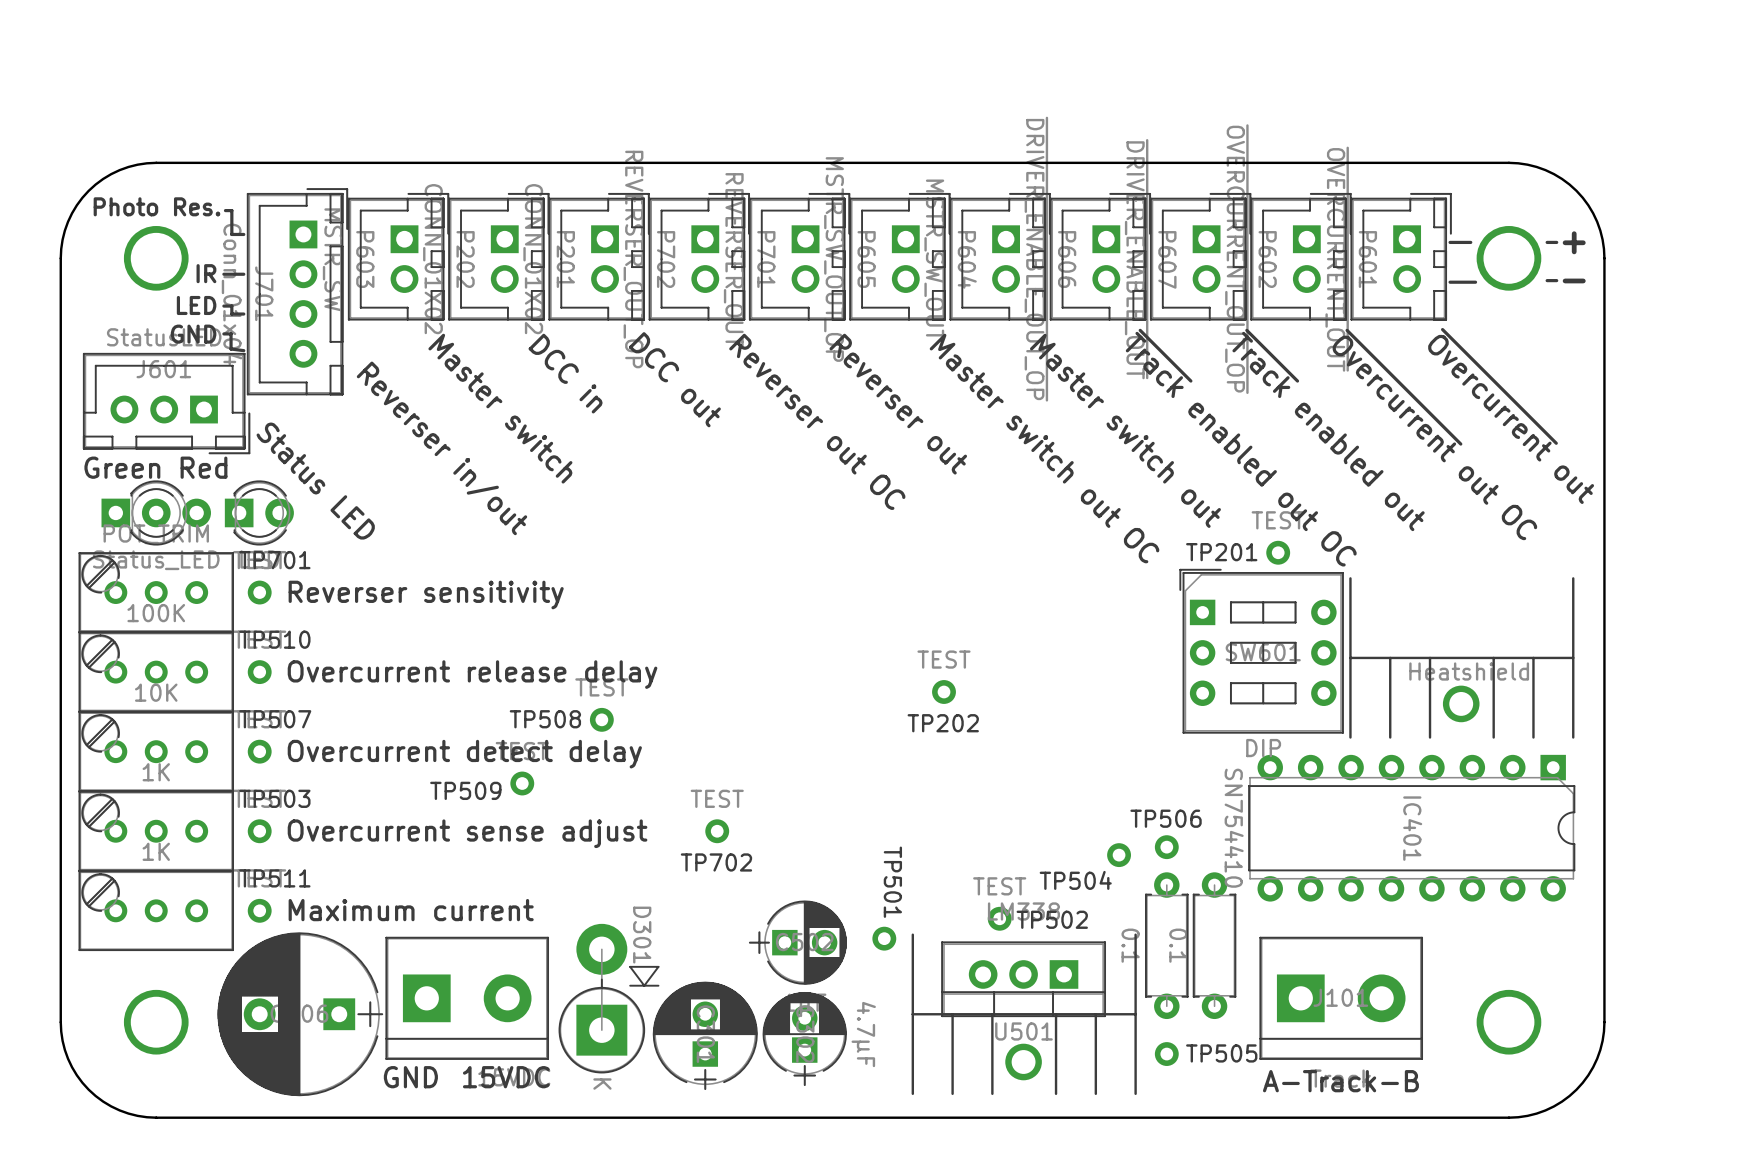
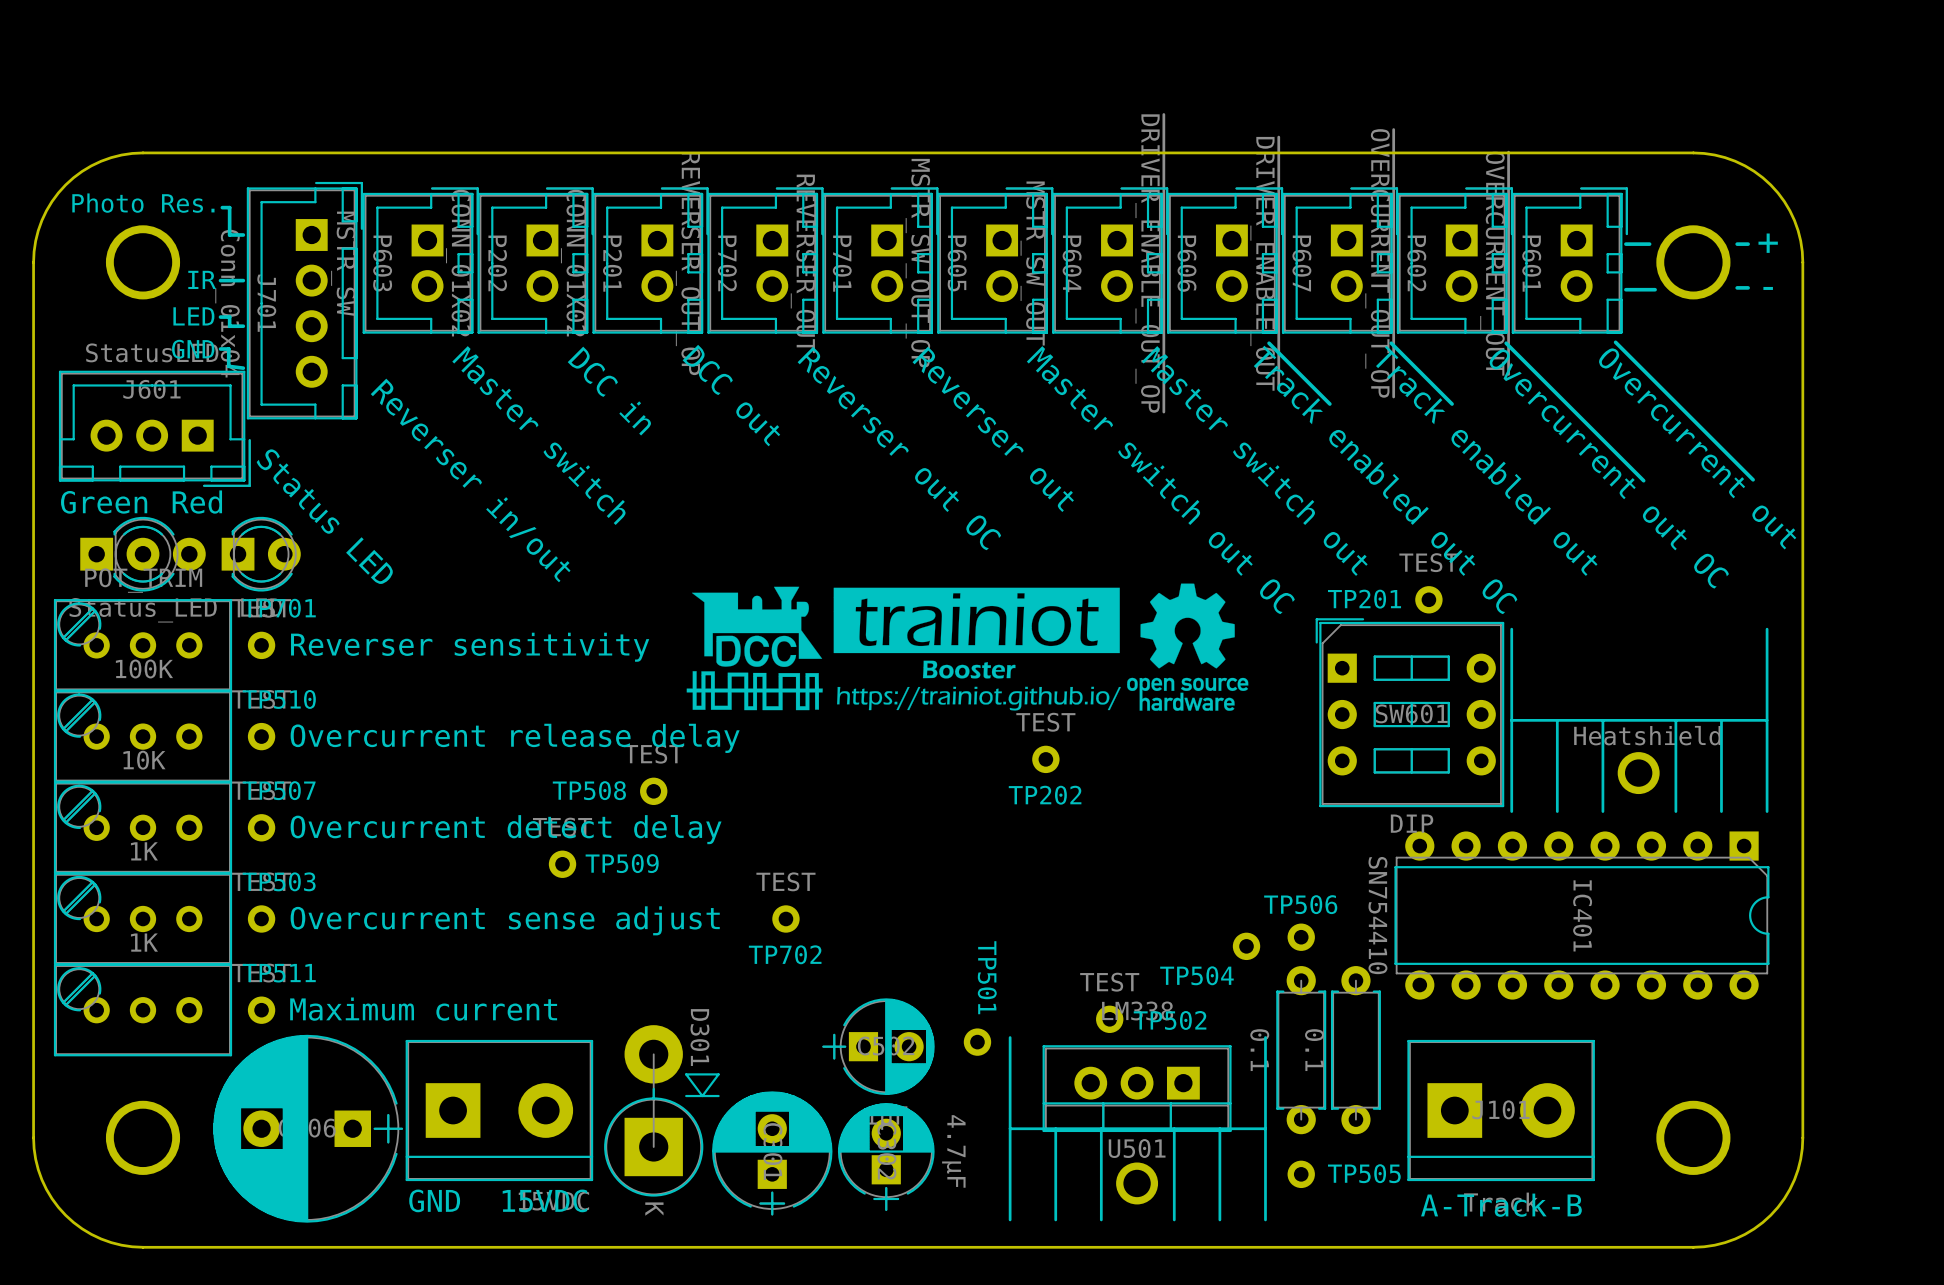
drawing: none -> [686, 583, 1249, 711]
TP509 name position: TP509 (465, 790) -> TP509 (622, 863)

